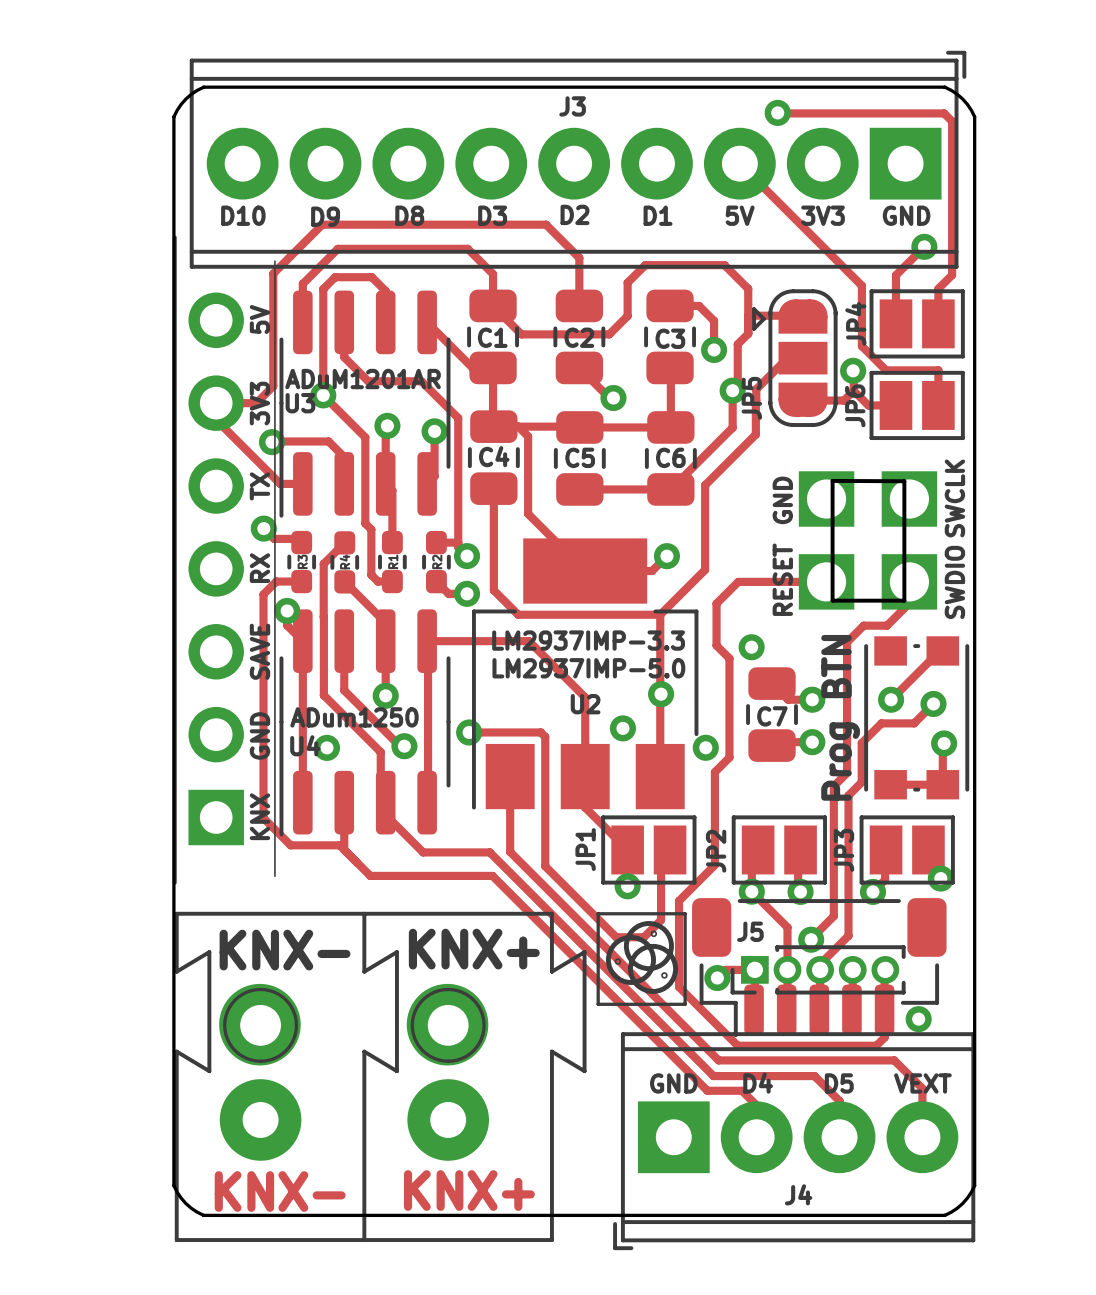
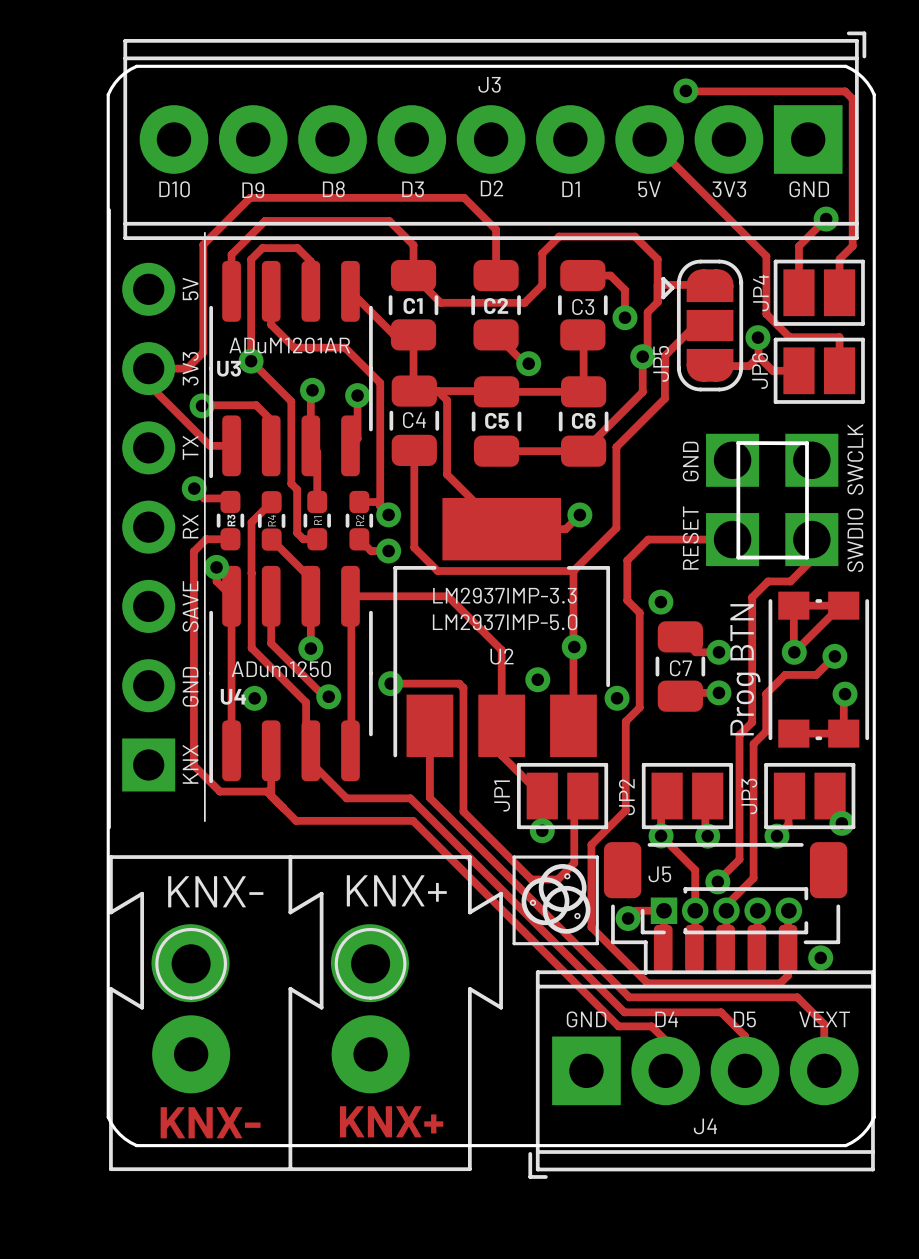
track: none -> (840, 605) (793, 605) (794, 652)

